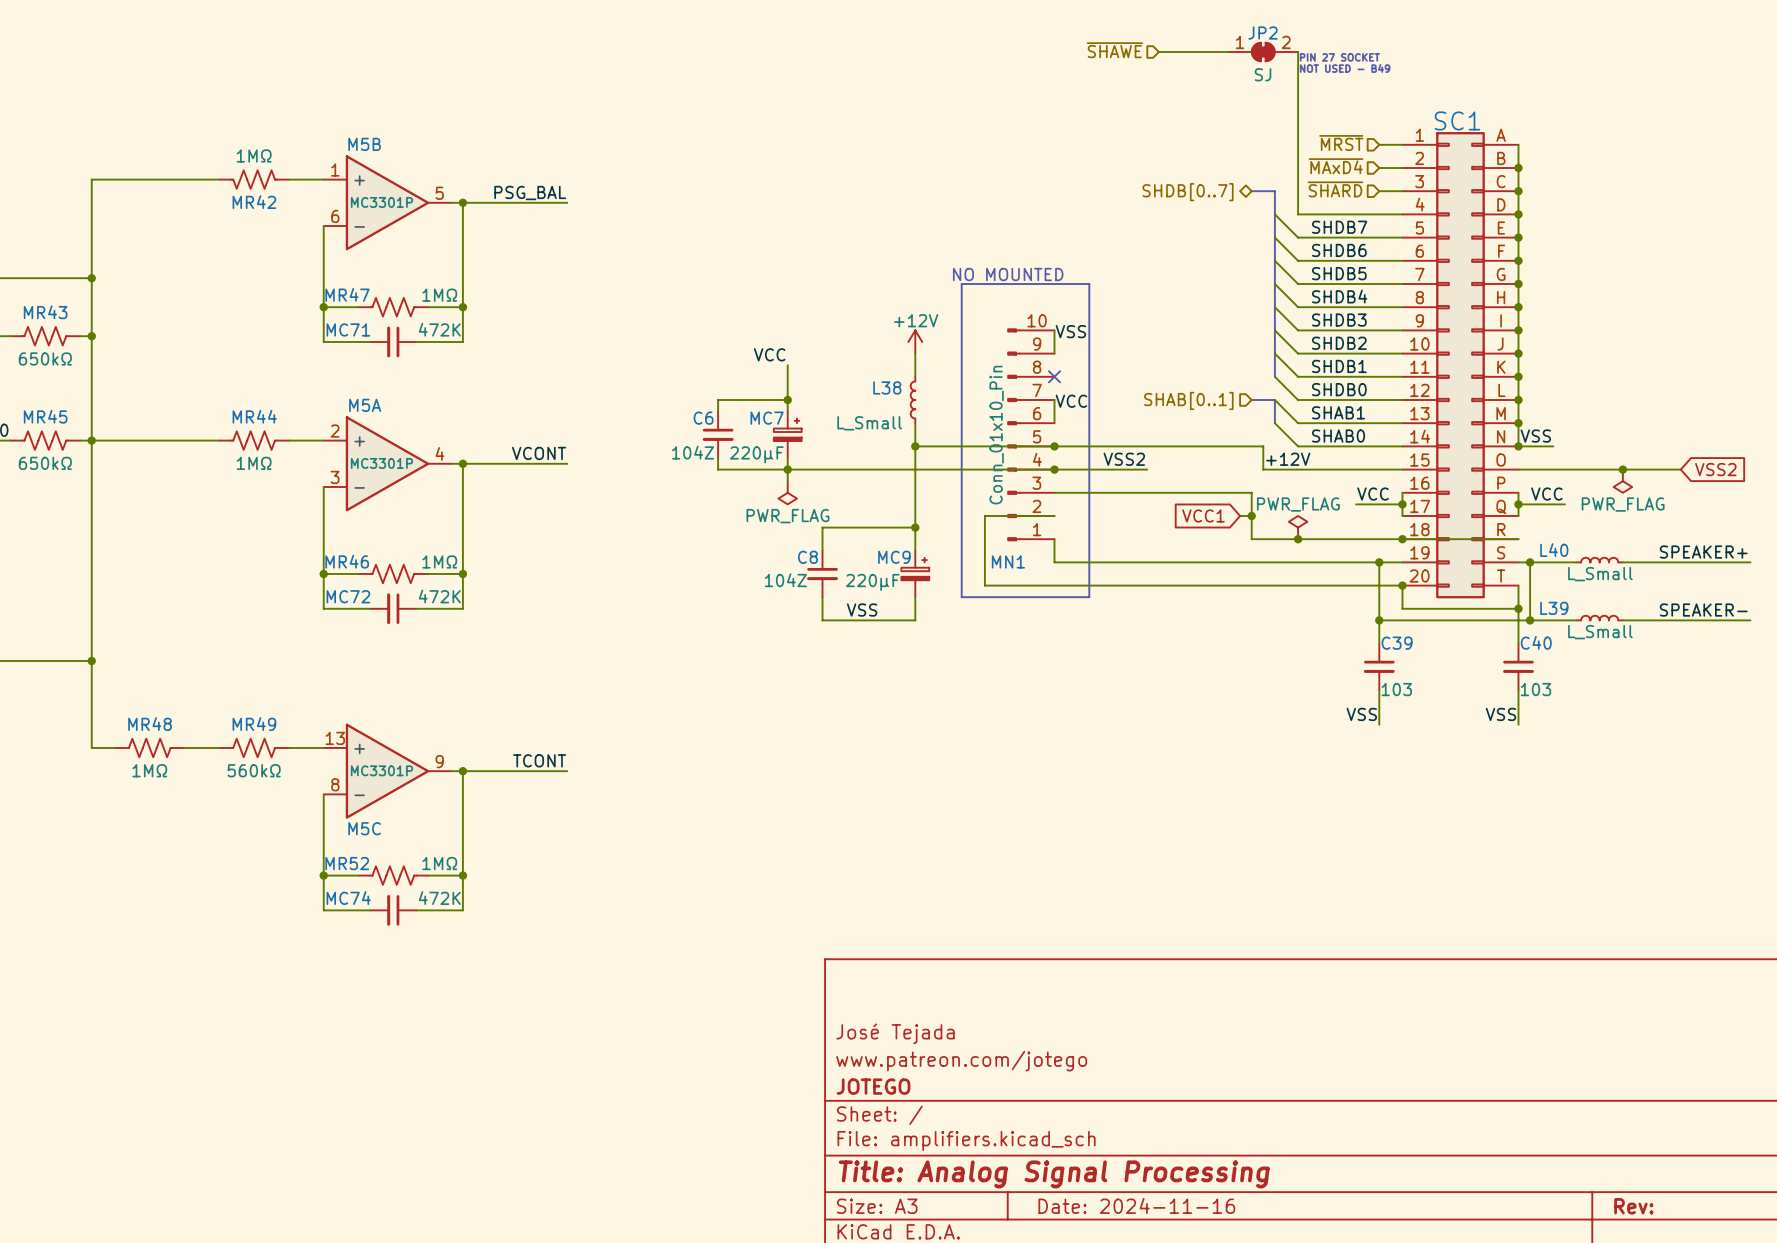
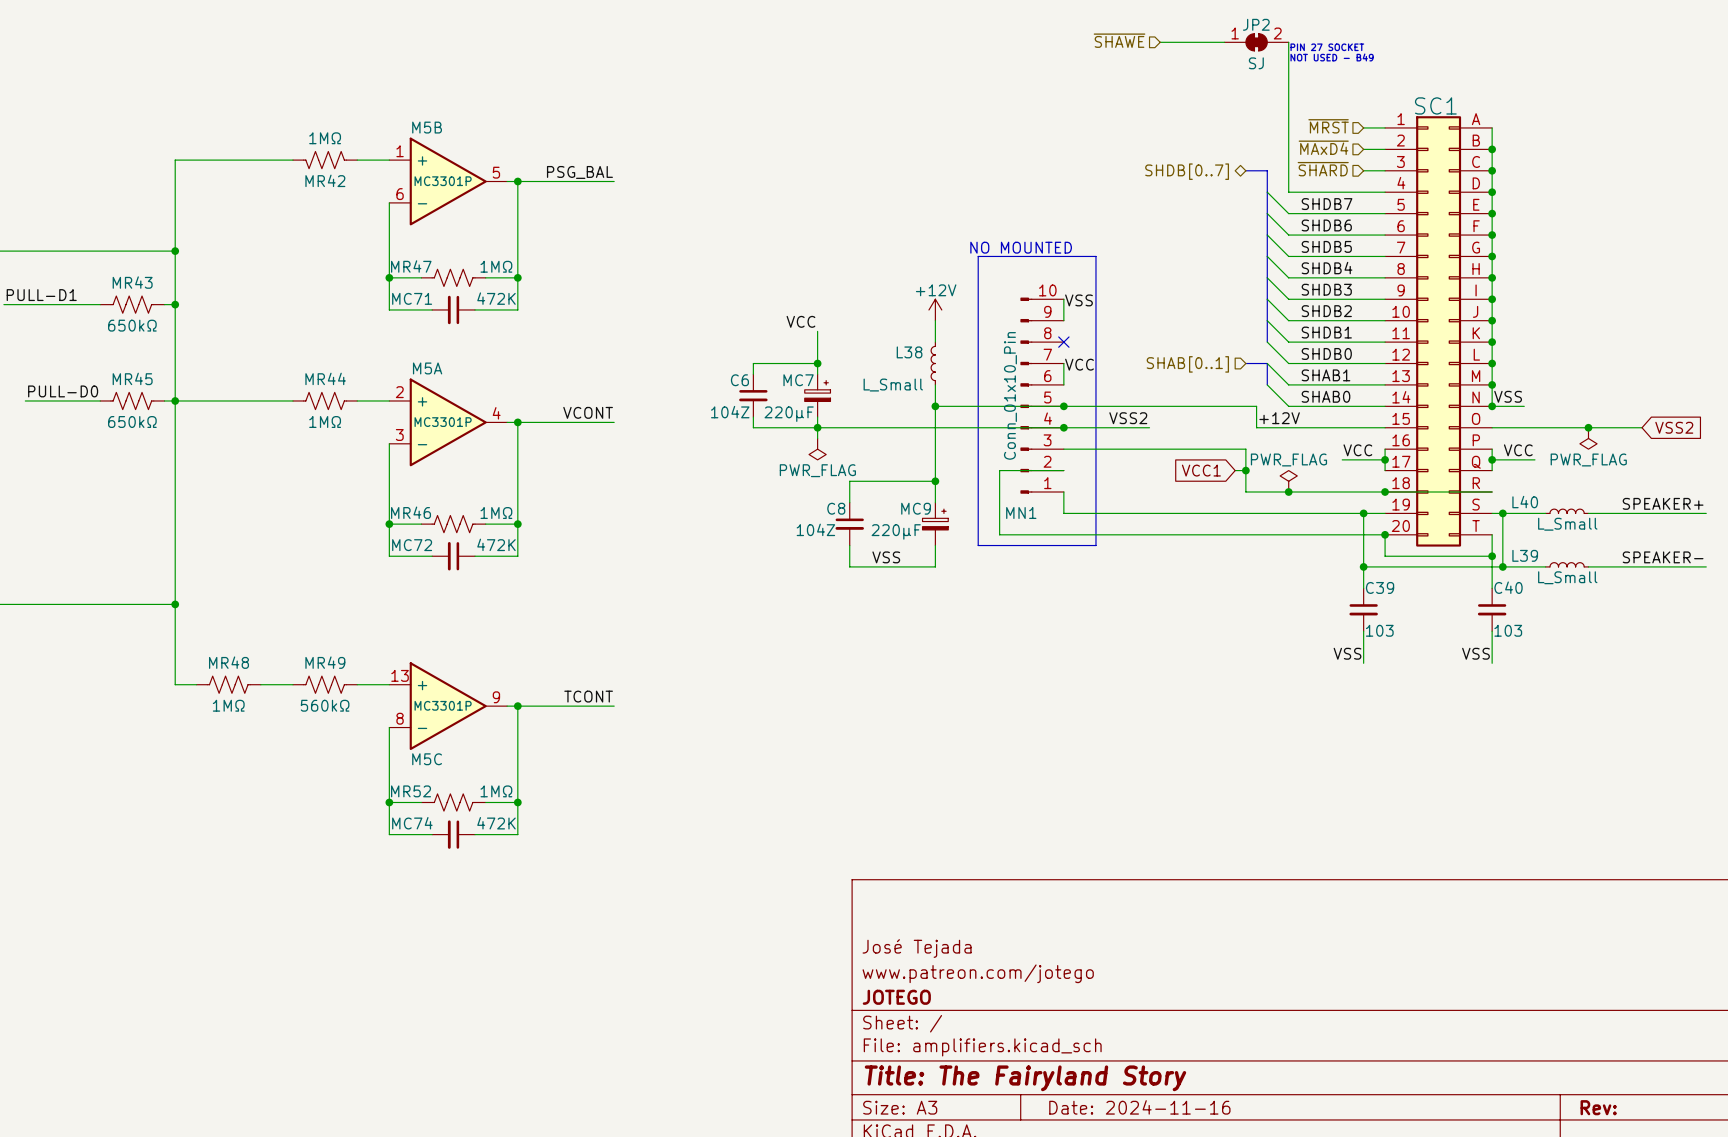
title block: Title: Analog Signal Processing (1054, 1174) -> Title: The Fairyland Story (1025, 1078)

